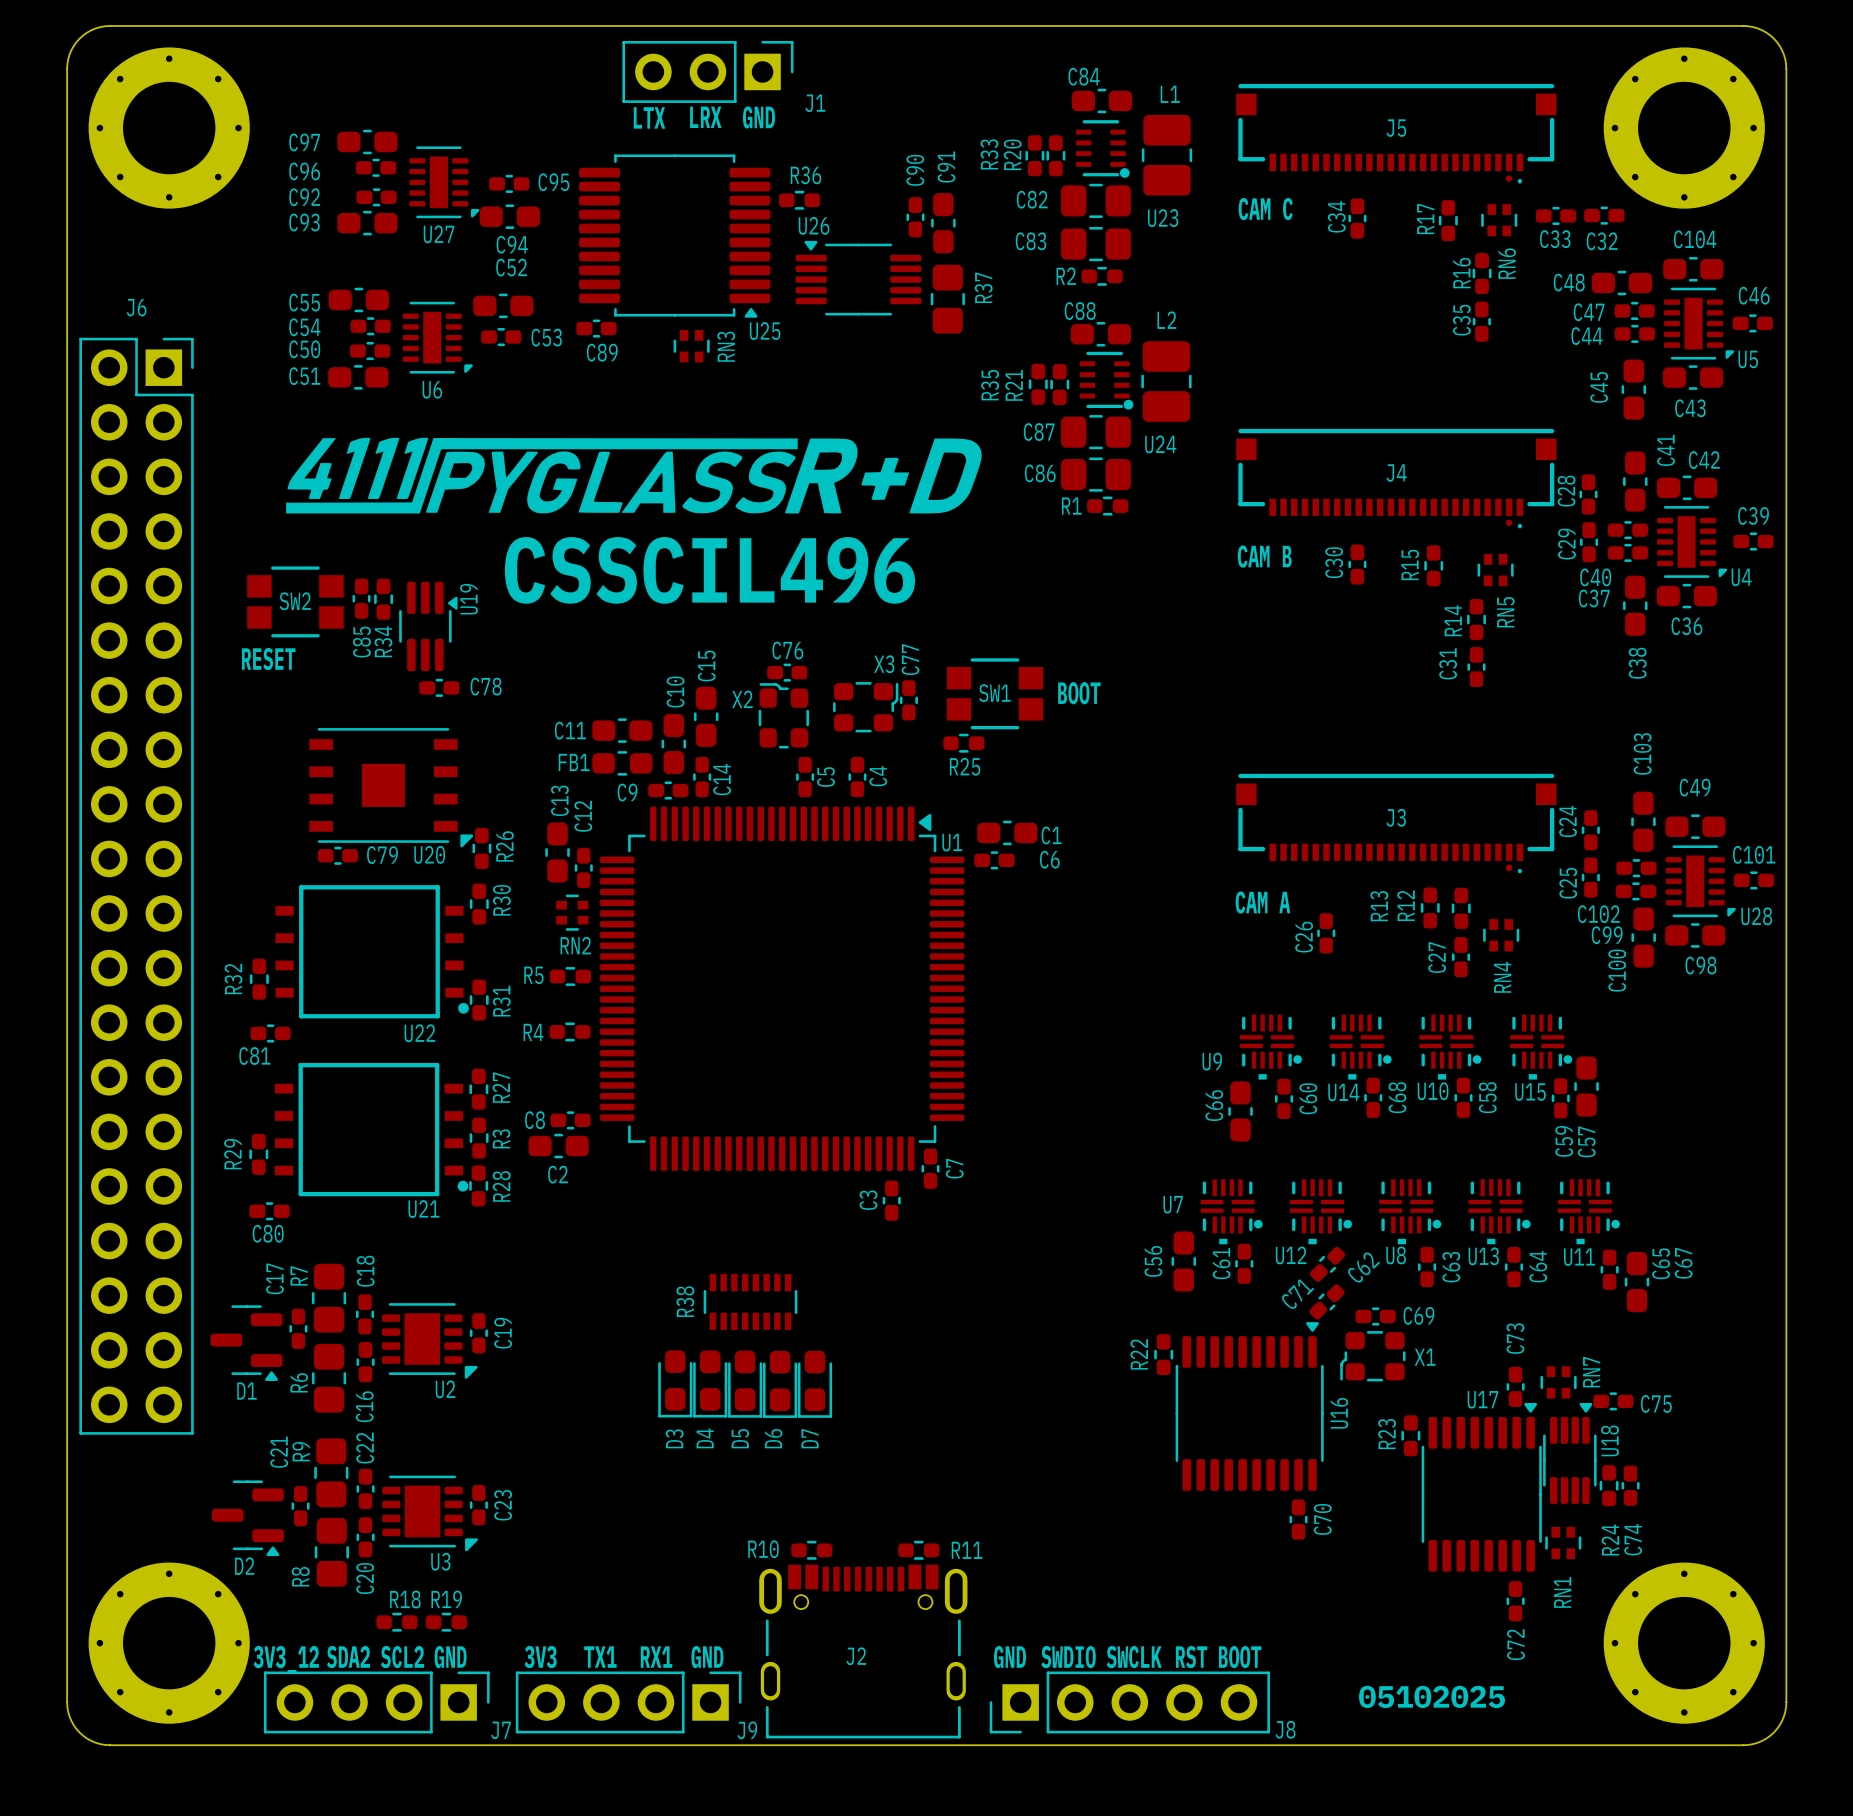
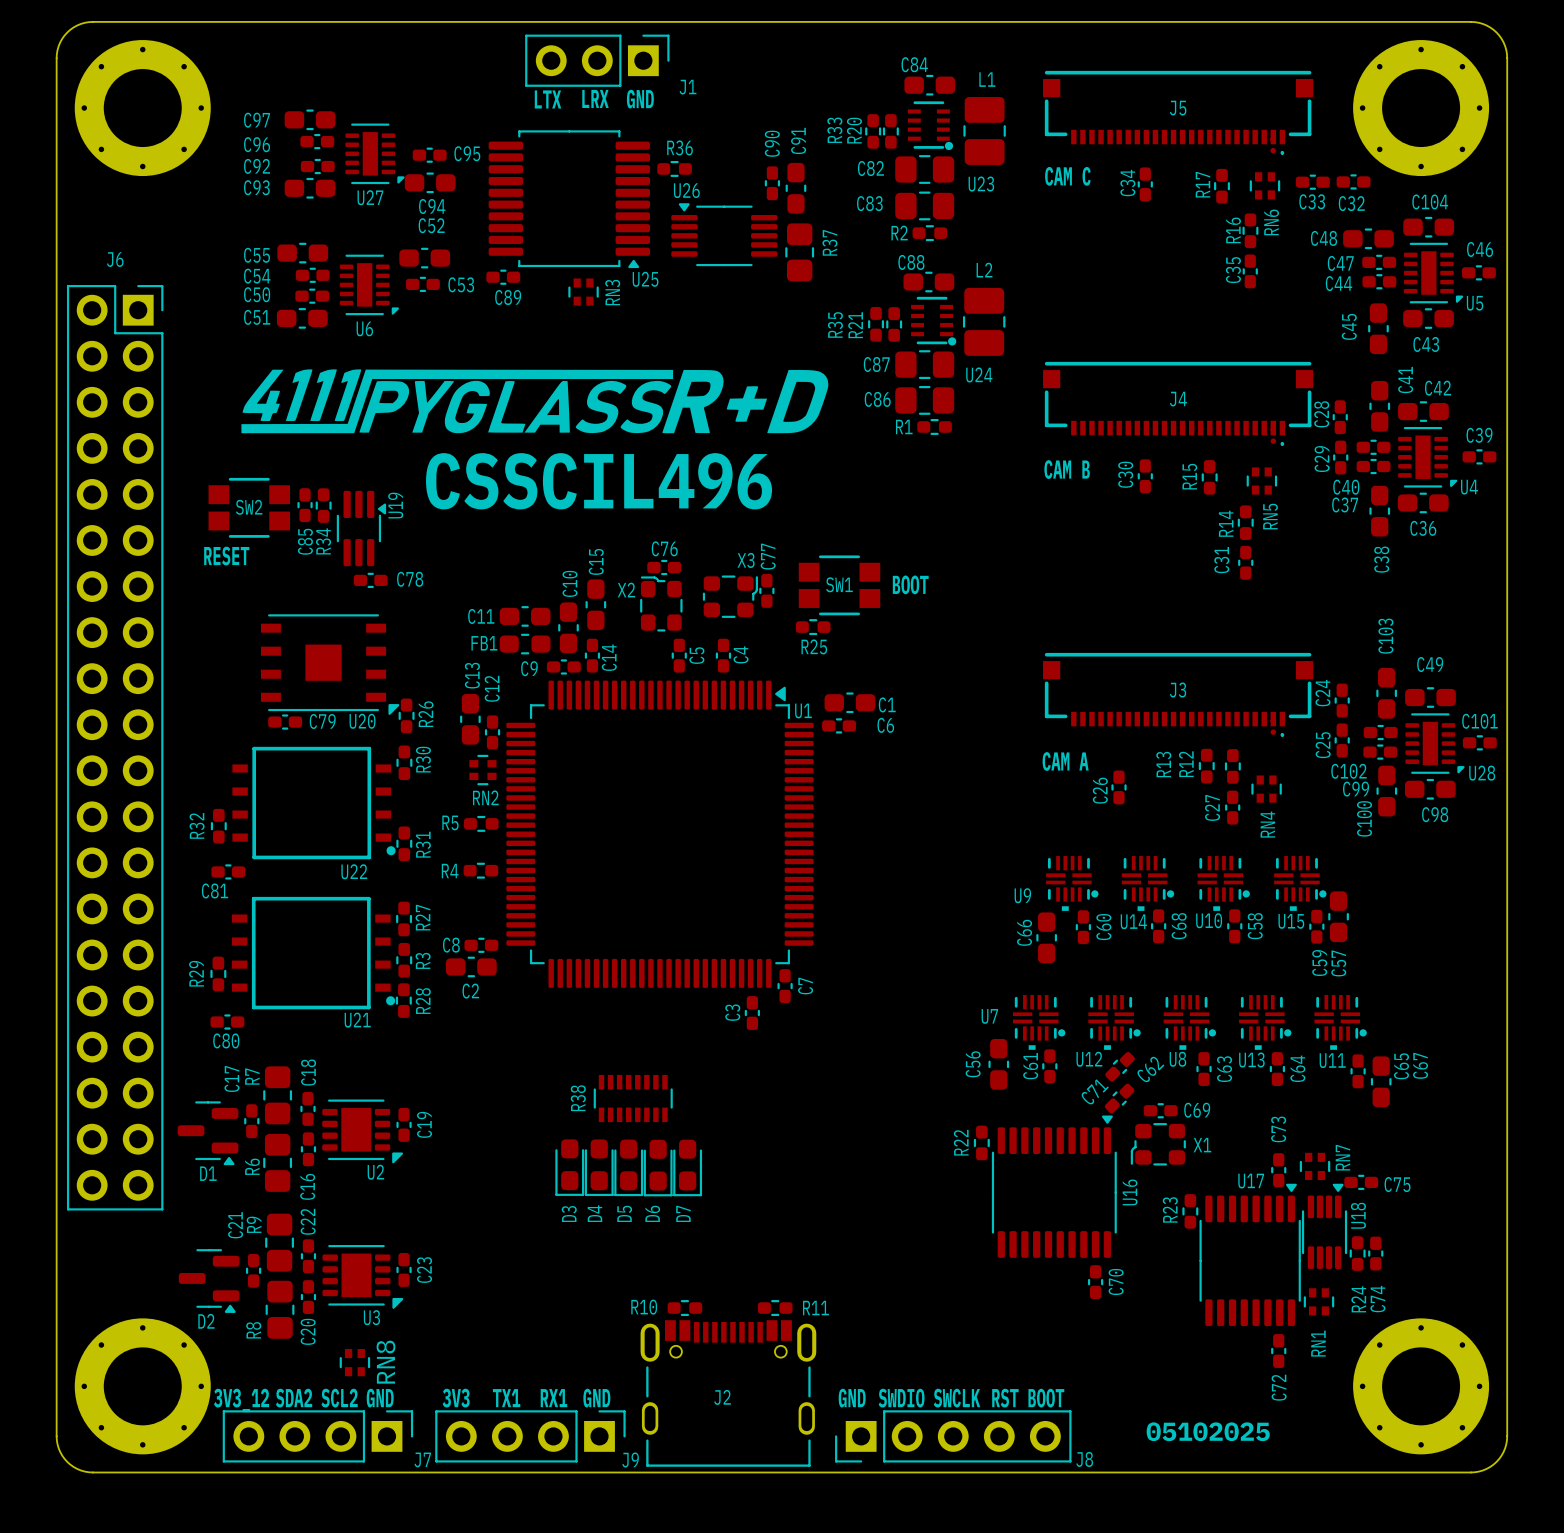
RN8: none -> (354, 1362)
R18: (397, 1622) -> none
R19: (446, 1622) -> none

